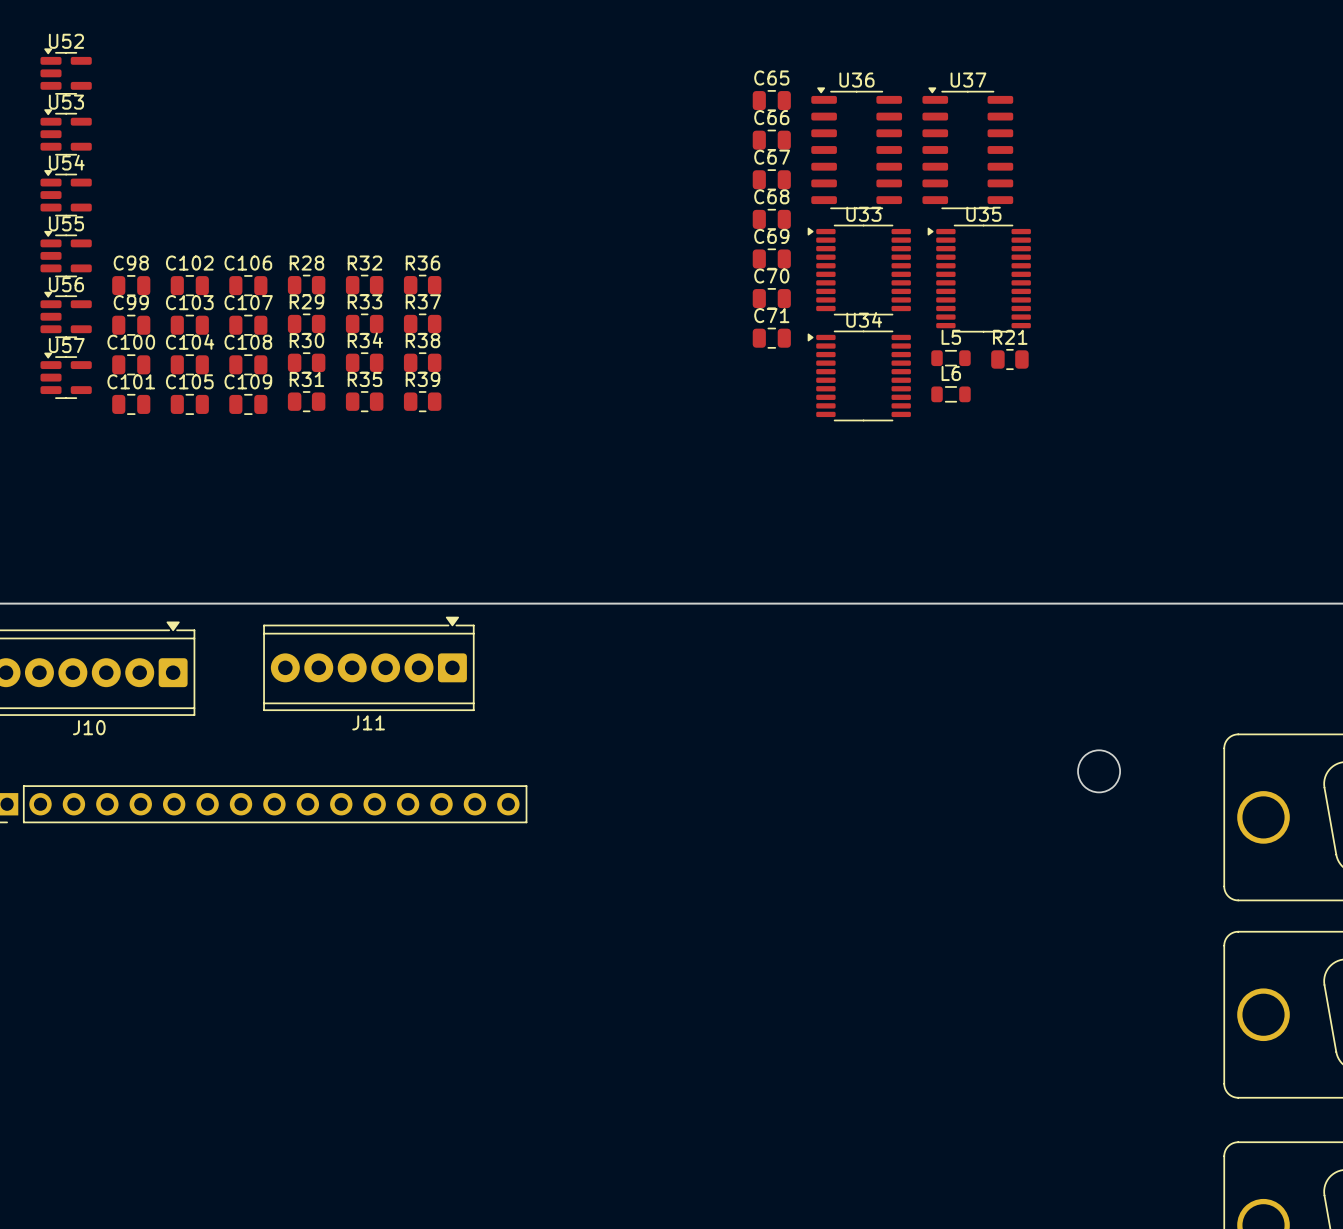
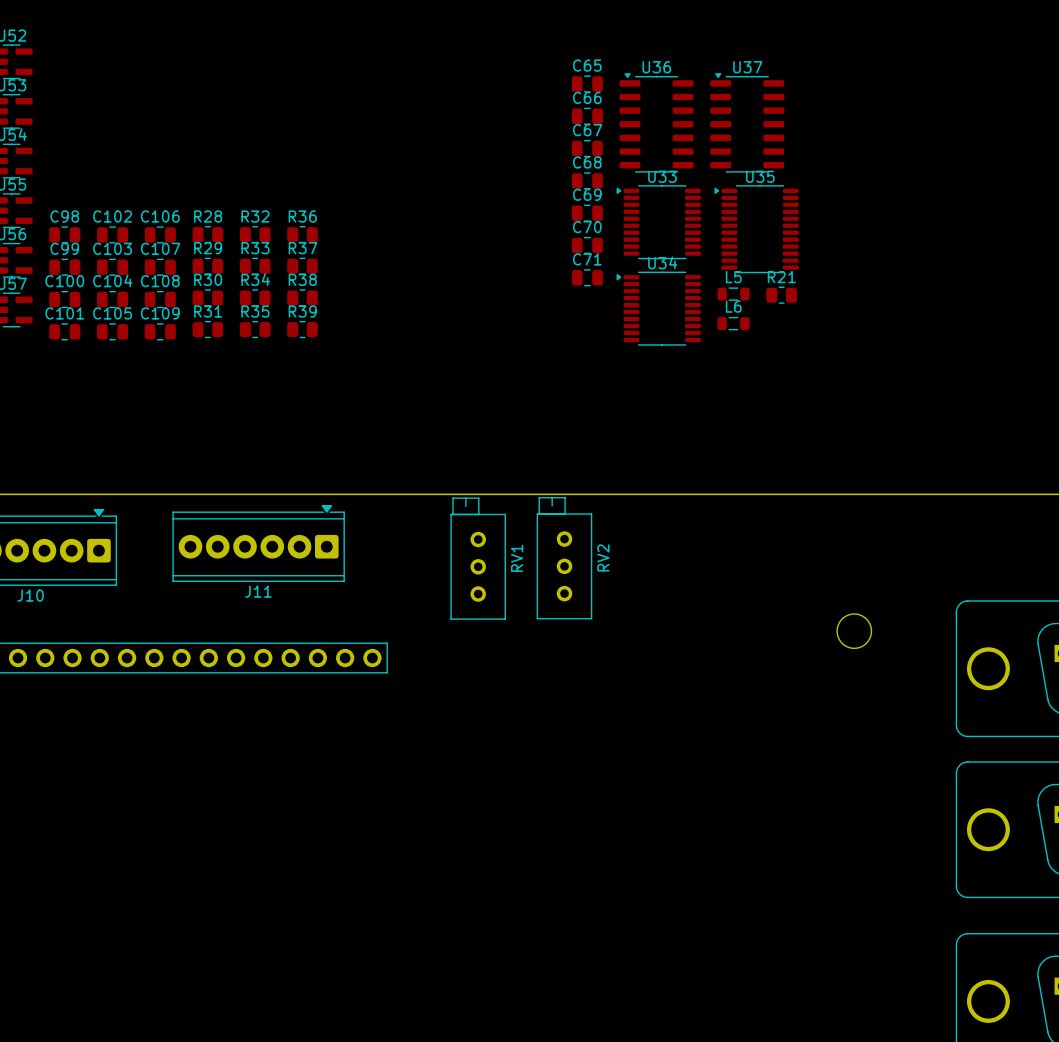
RV2: none -> (564, 558)
RV1: none -> (478, 558)

